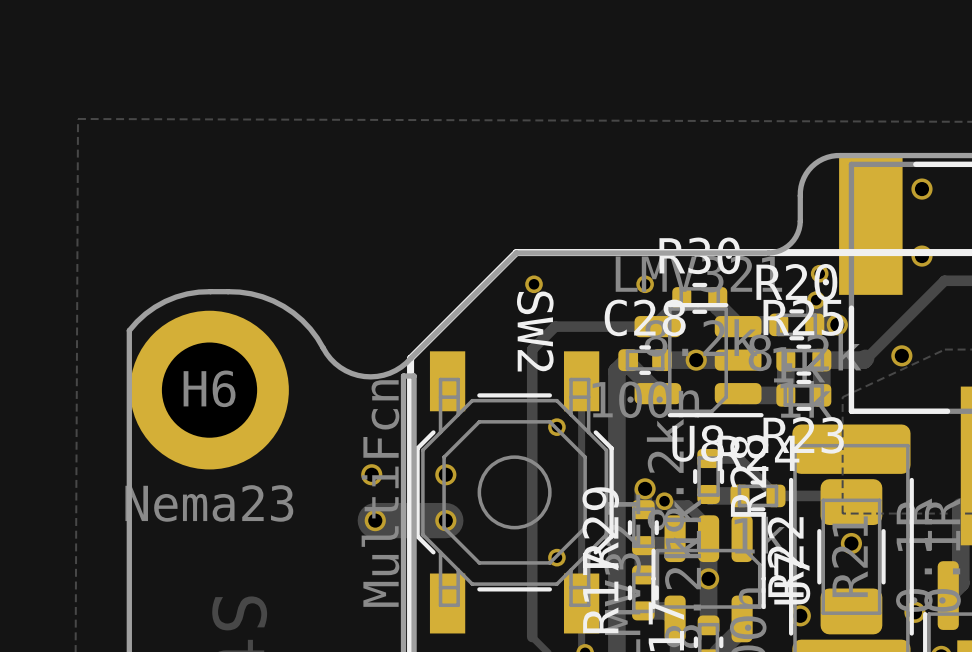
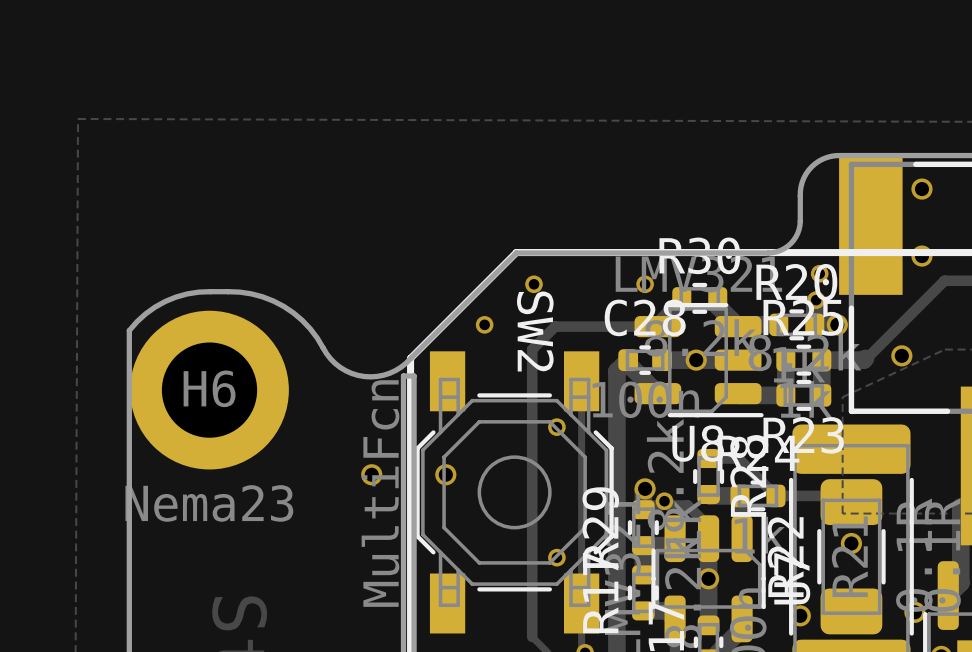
via: none -> (484, 324)
track: (375, 520) (445, 520) -> none
via: (375, 520) -> none
via: (445, 520) -> none

